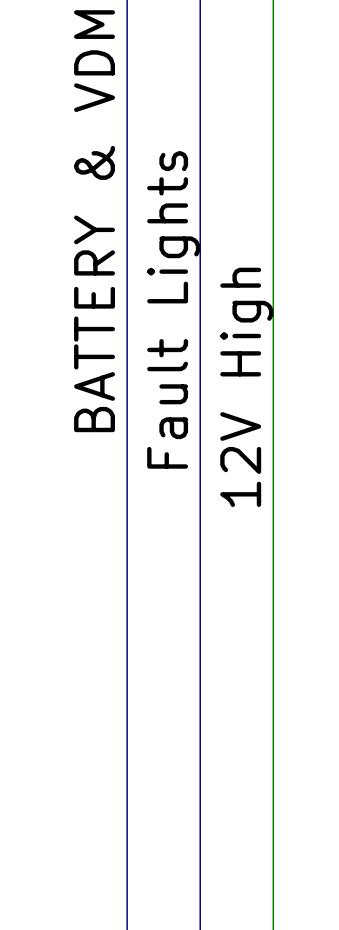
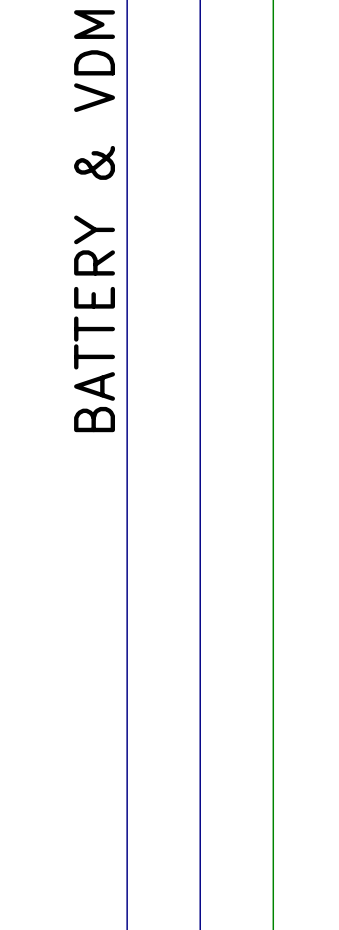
label: Fault Lights (173, 309) -> none
label: 12V High (246, 387) -> none

